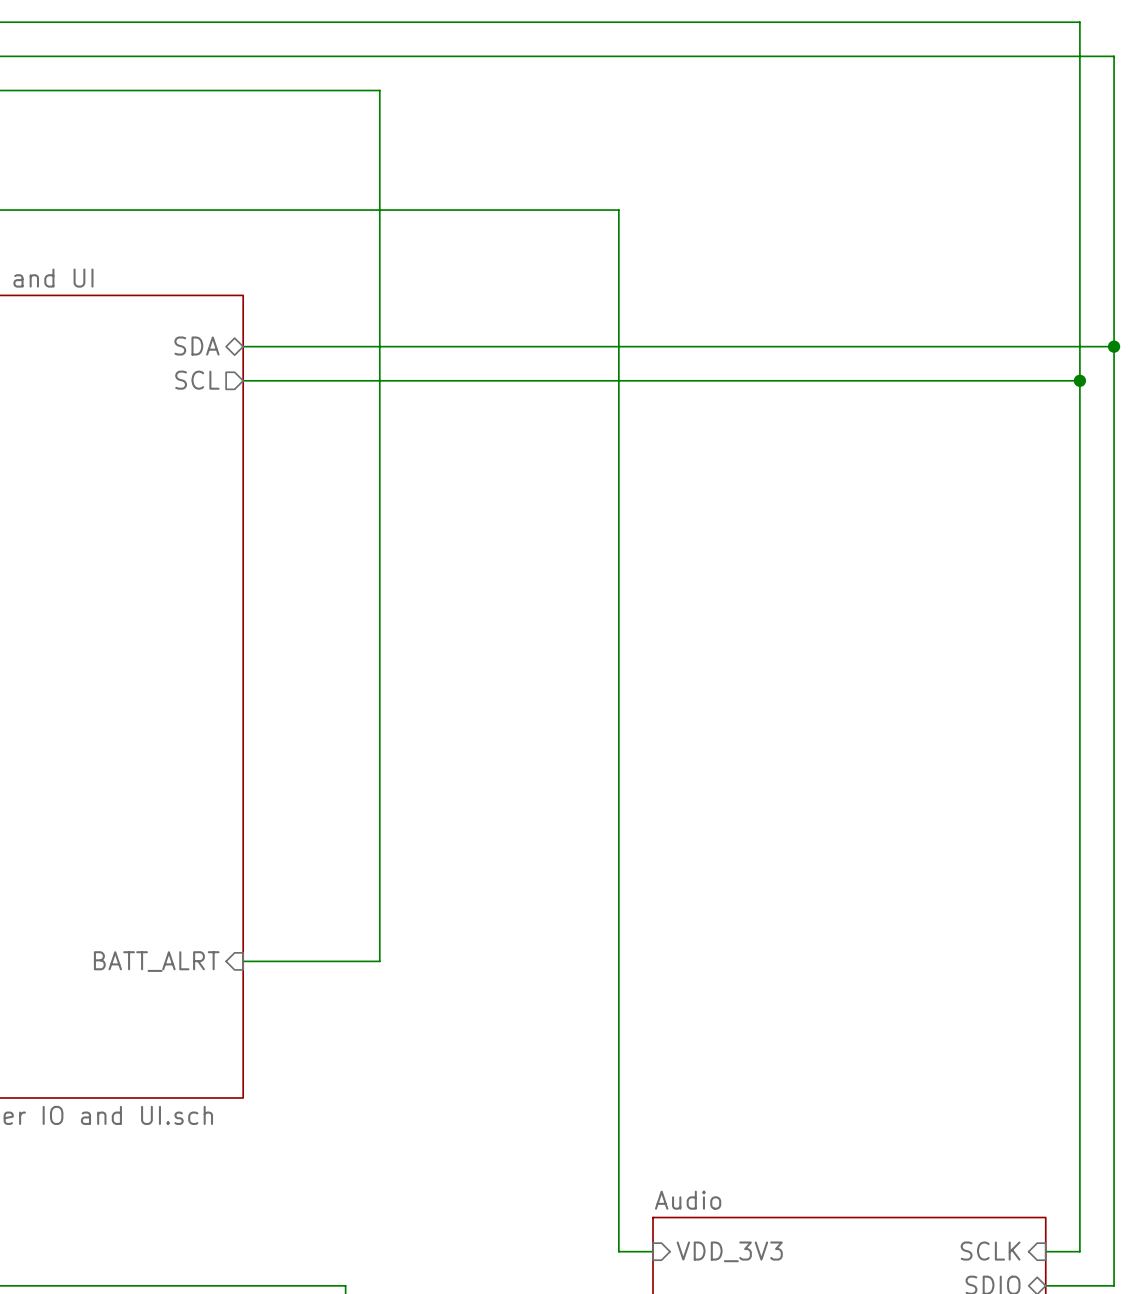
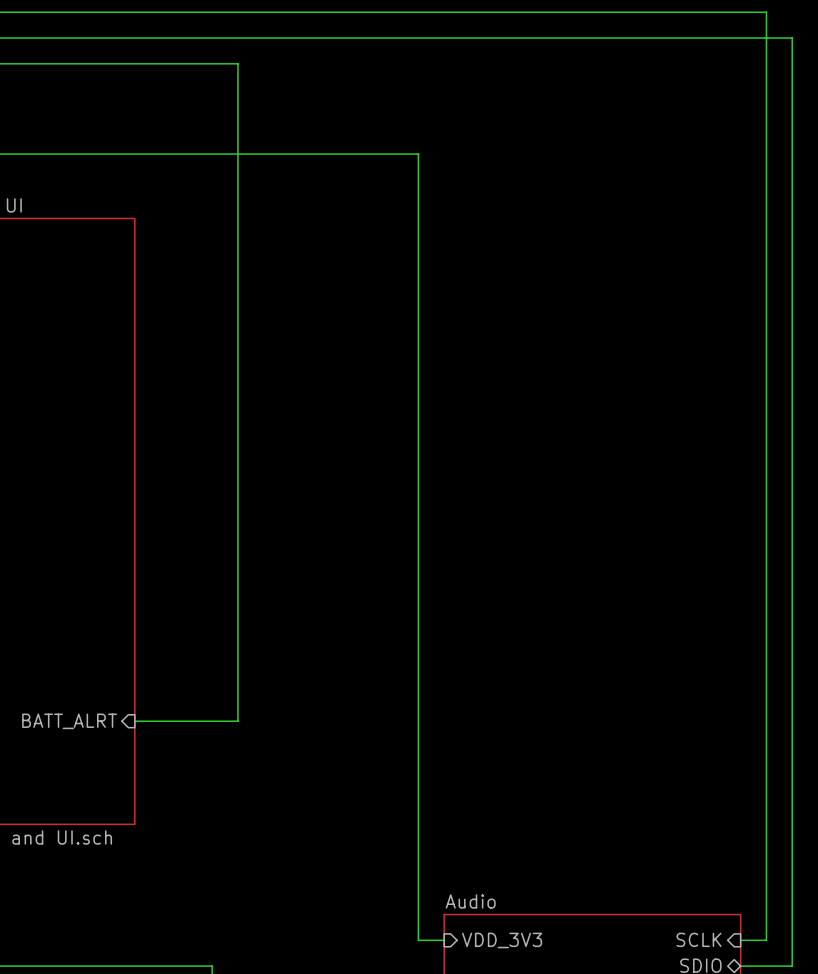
sheet pin: SDA (196, 346) -> none
wire: (243, 346) (1114, 346) -> none
junction: (1114, 346) -> none
sheet pin: SCL (197, 380) -> none
wire: (243, 380) (1079, 380) -> none
junction: (1079, 380) -> none

